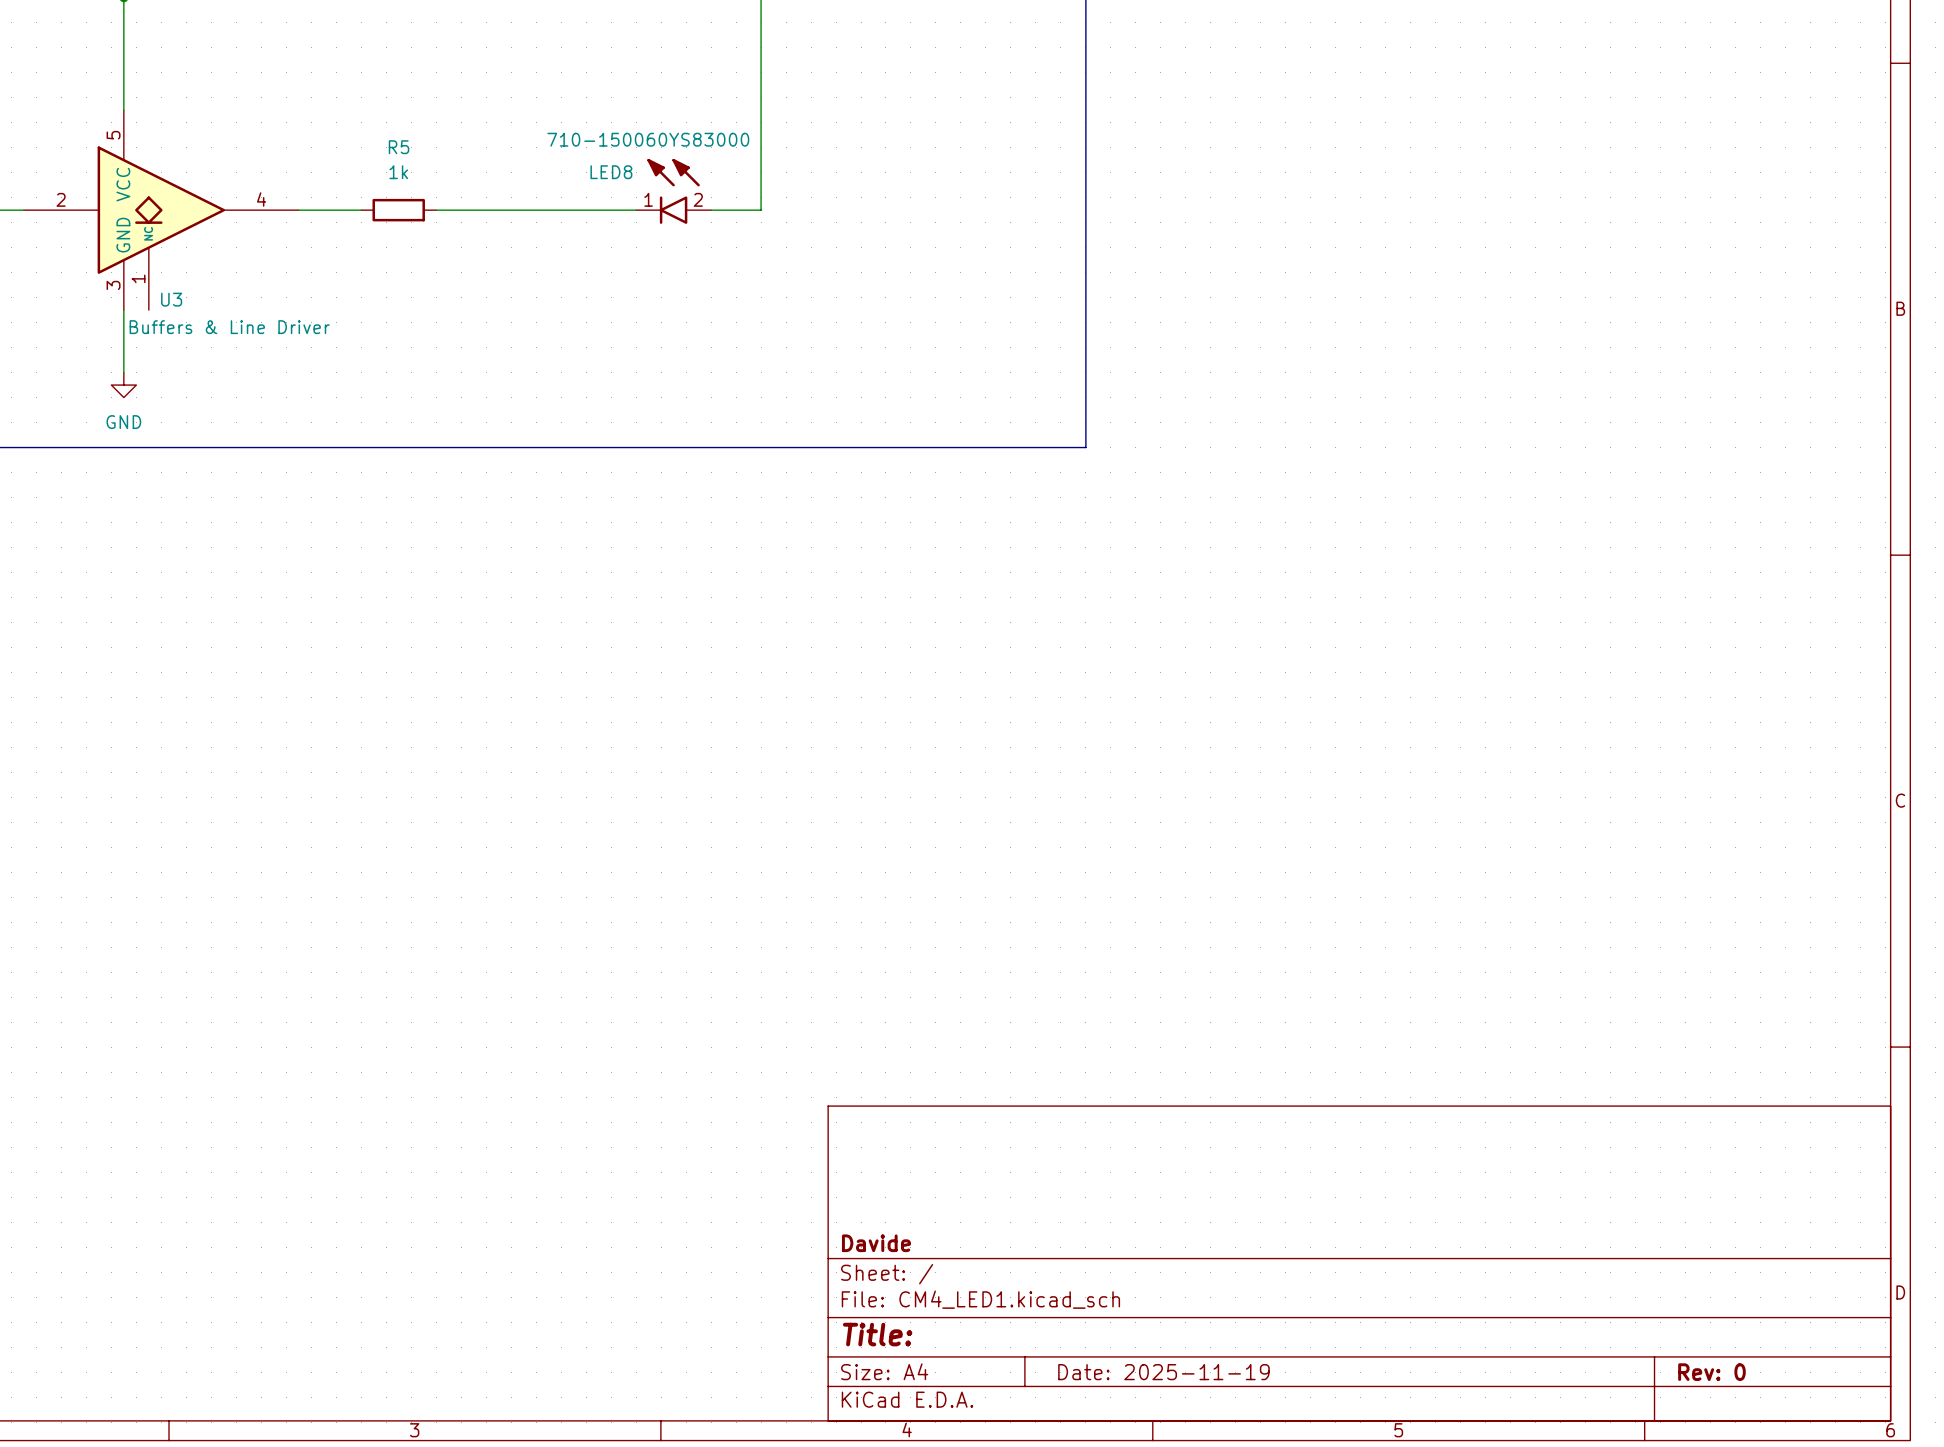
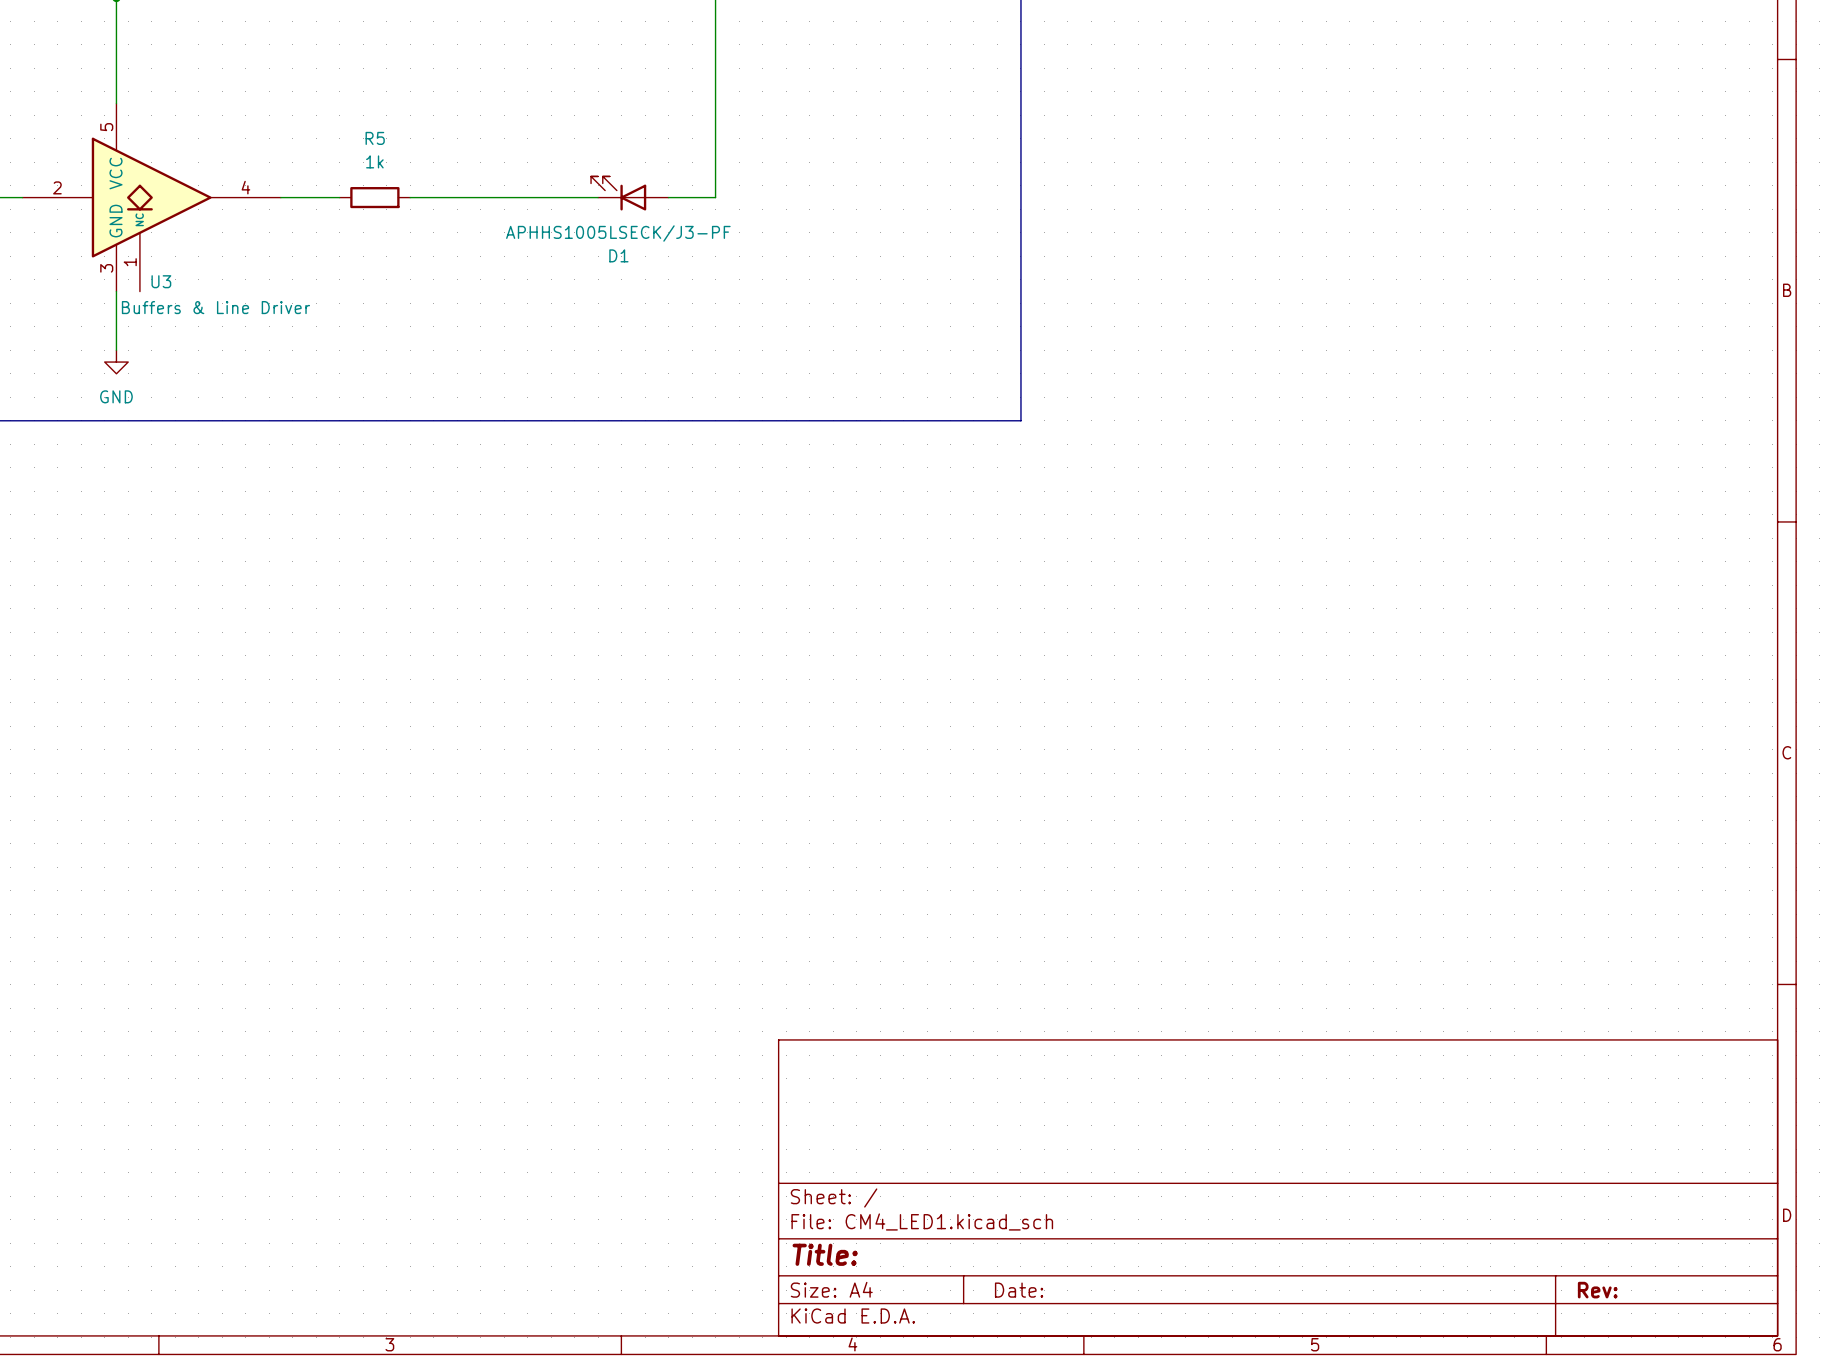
LED8: 710-150060YS83000 (673, 191) -> none
D1: none -> APHHS1005LSECK/J3-PF (629, 193)
title block: Davide (876, 1243) -> none
title block: Date: 2025-11-19 (1163, 1372) -> Date: (1019, 1290)
title block: Rev: 0 (1711, 1372) -> Rev: (1597, 1290)

